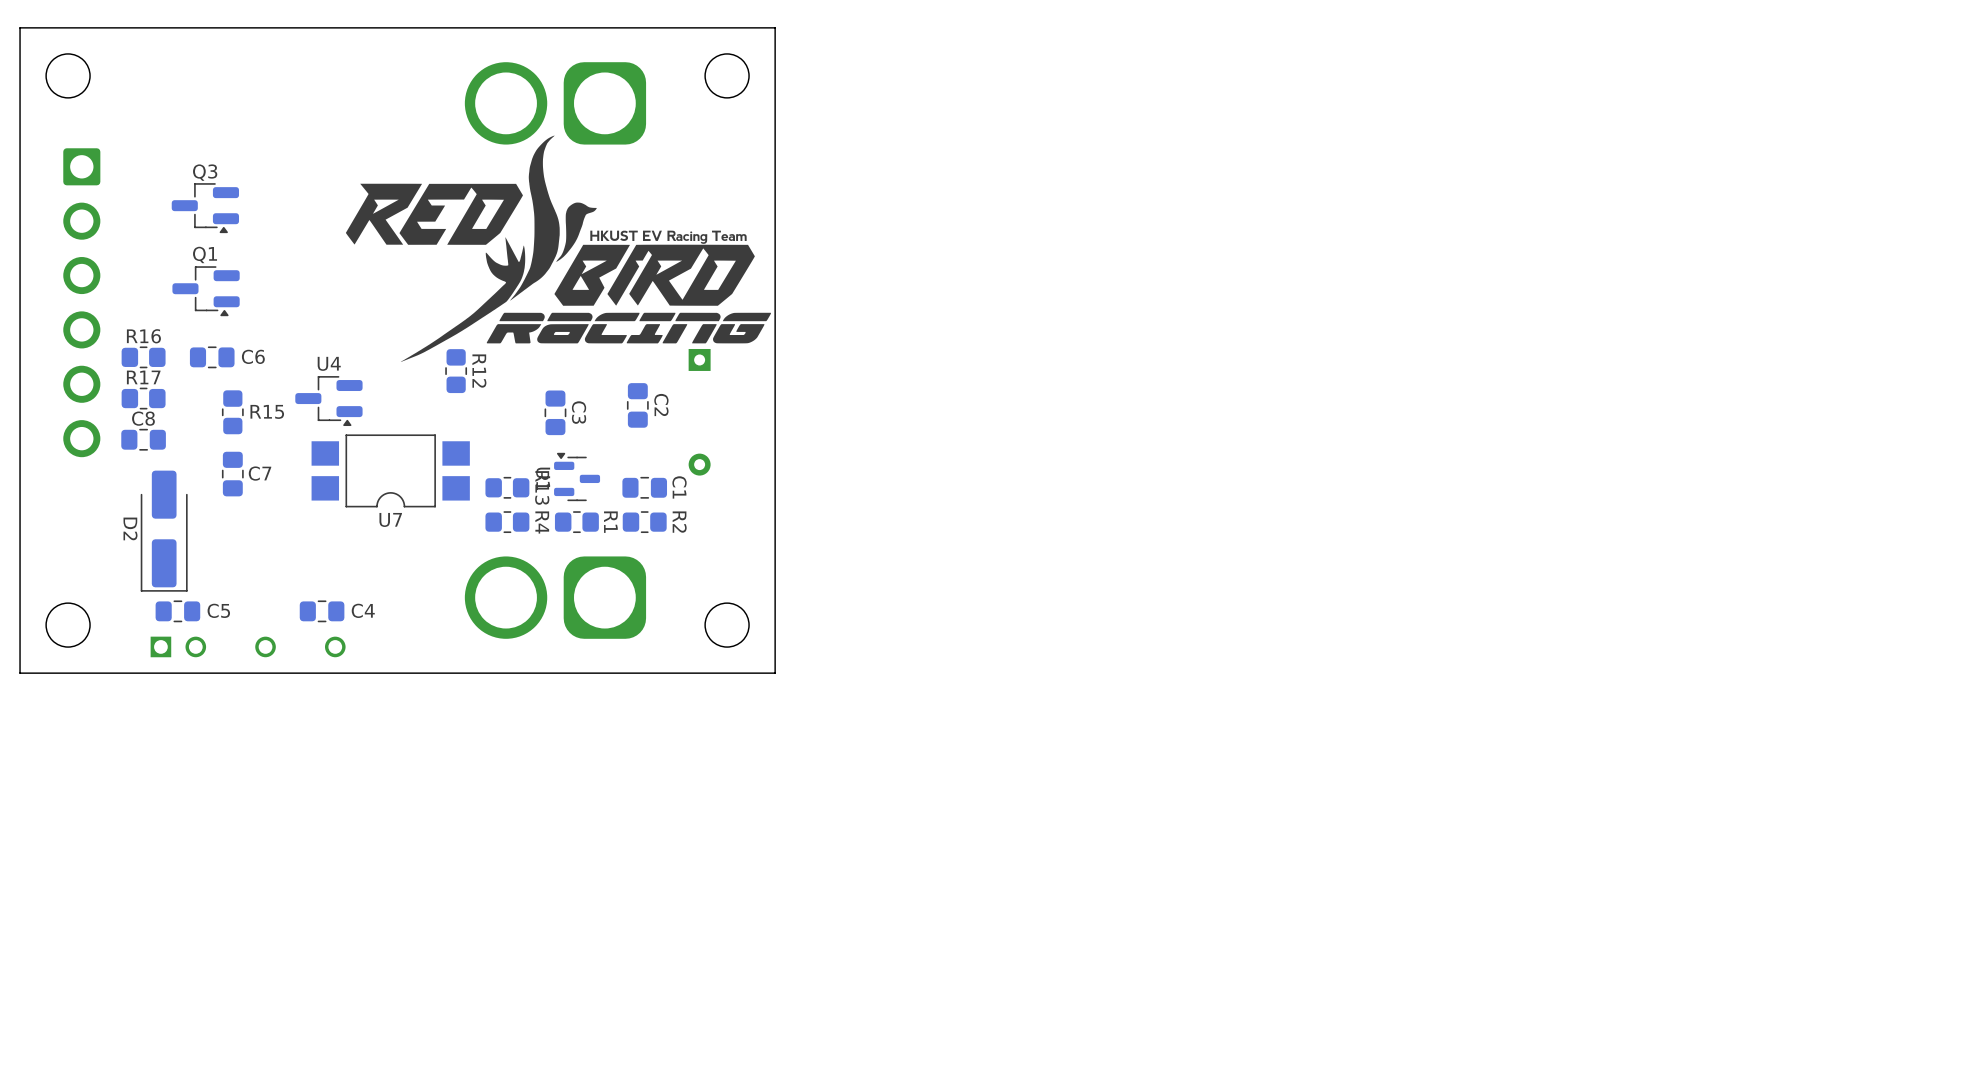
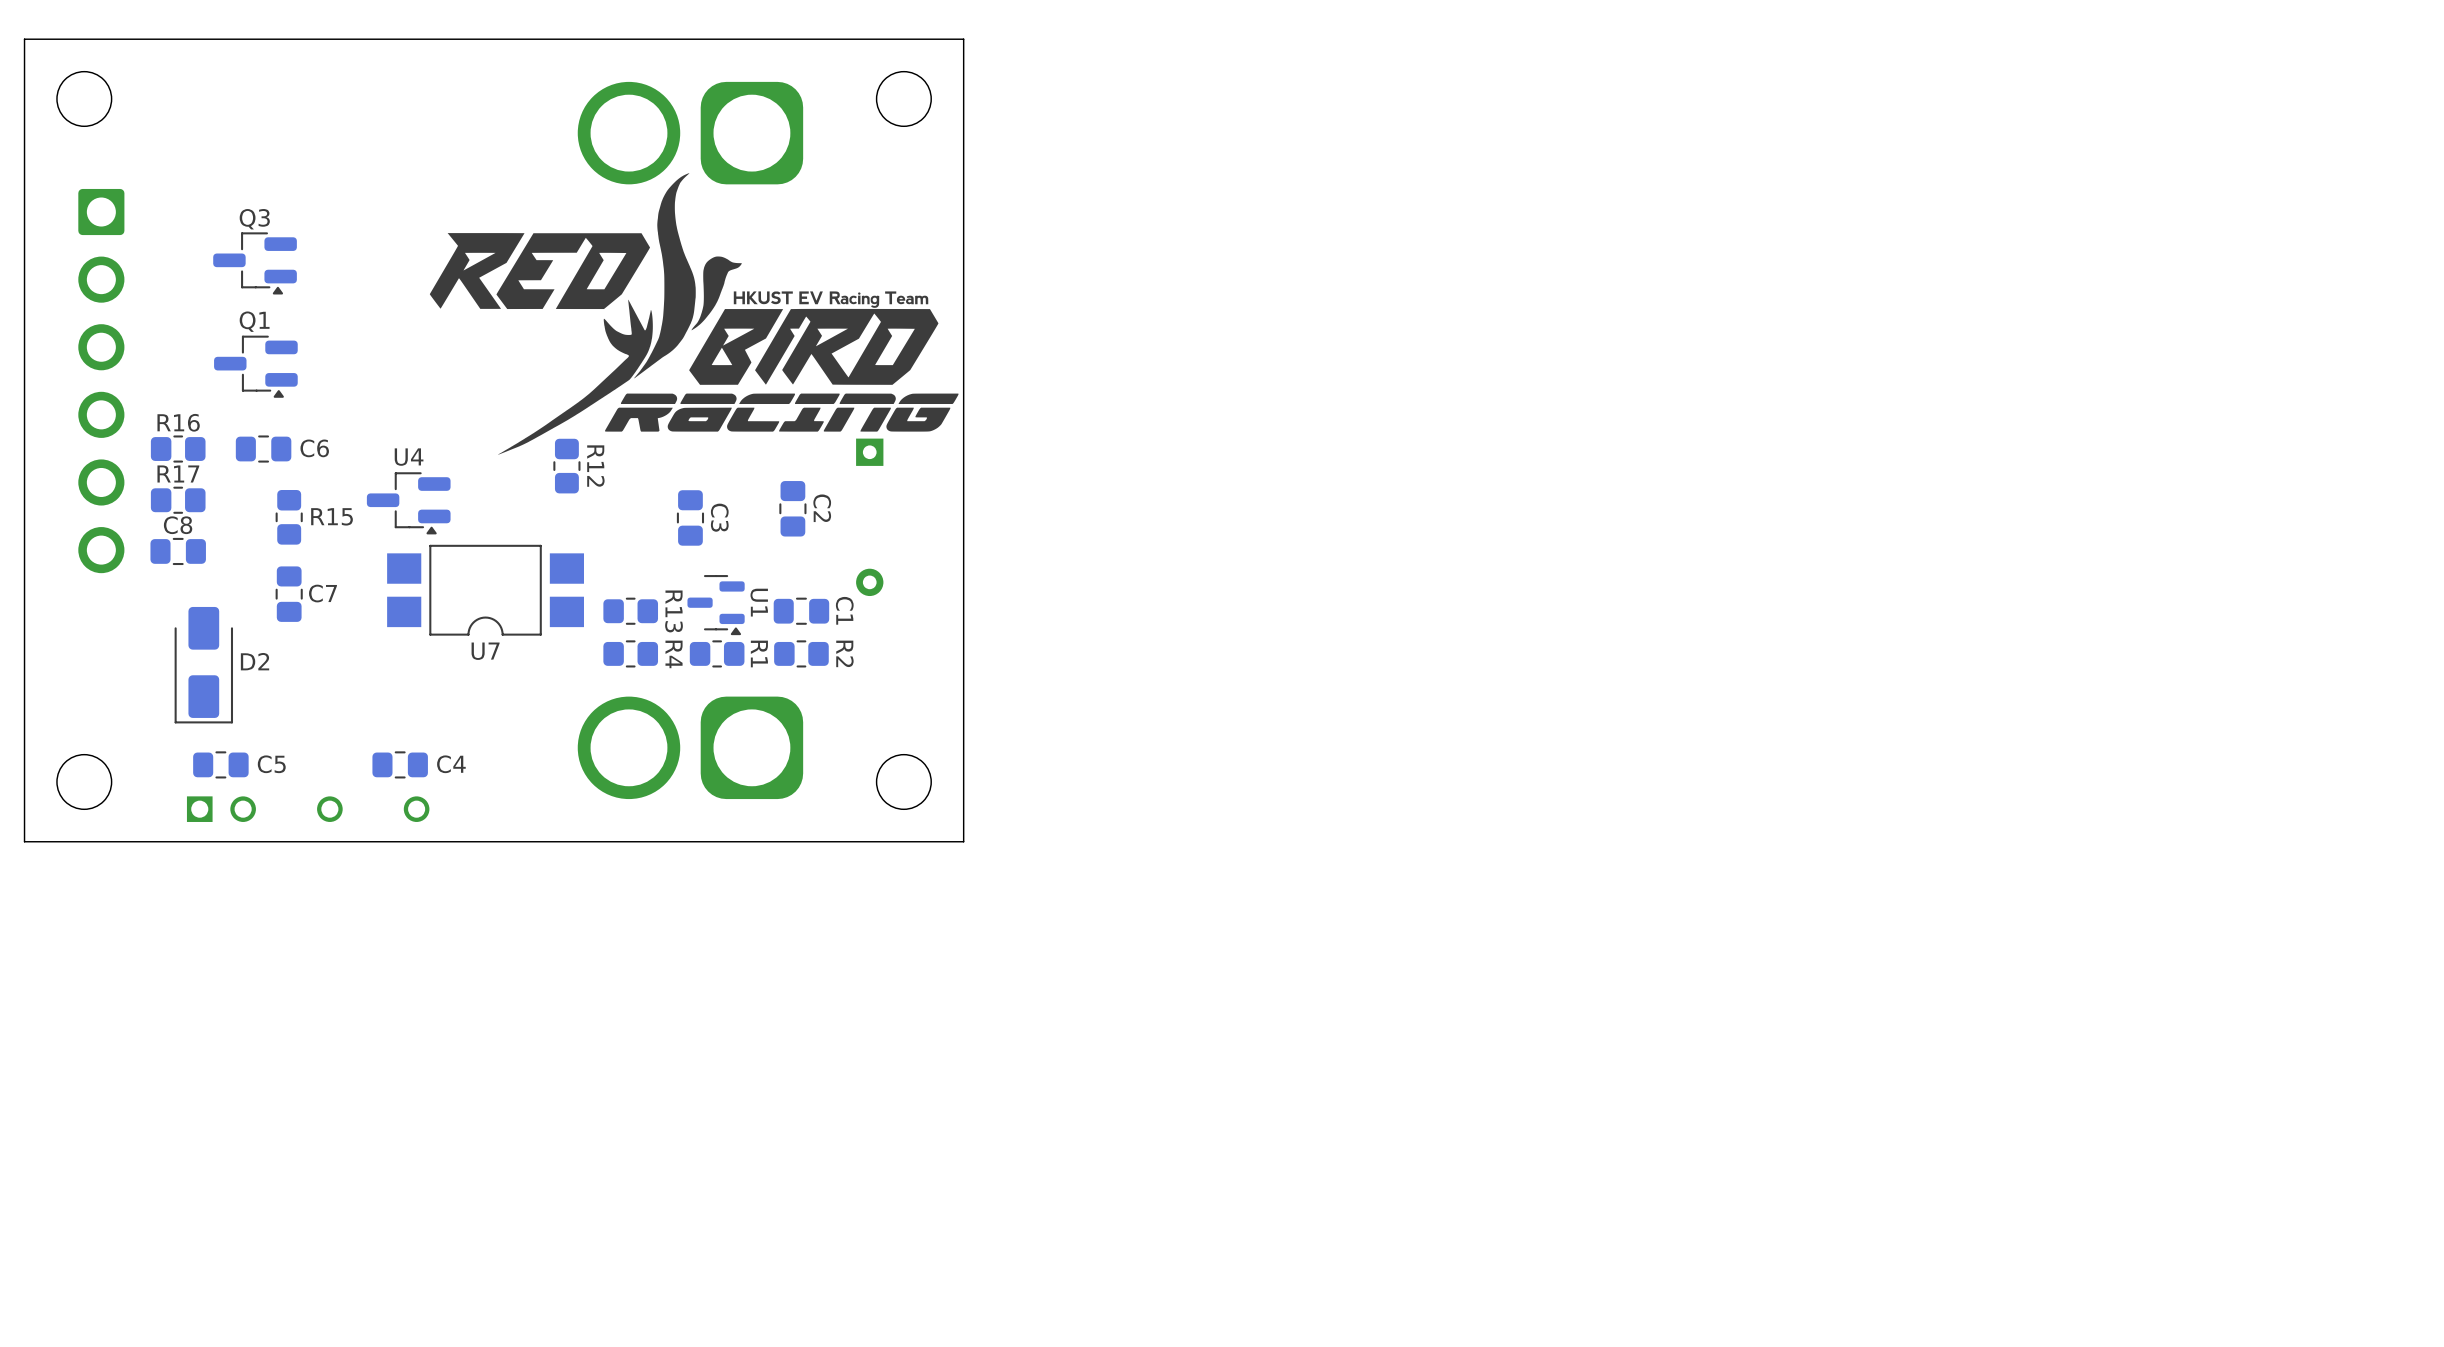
D2 footprint: [140, 470, 188, 592] -> [174, 606, 234, 724]
U1 rotation: 0° (577, 476) -> 180° (716, 605)
D2 name rotation: 0° (130, 528) -> 90° counterclockwise (255, 661)
D2 name position: D2 (130, 528) -> D2 (255, 661)

